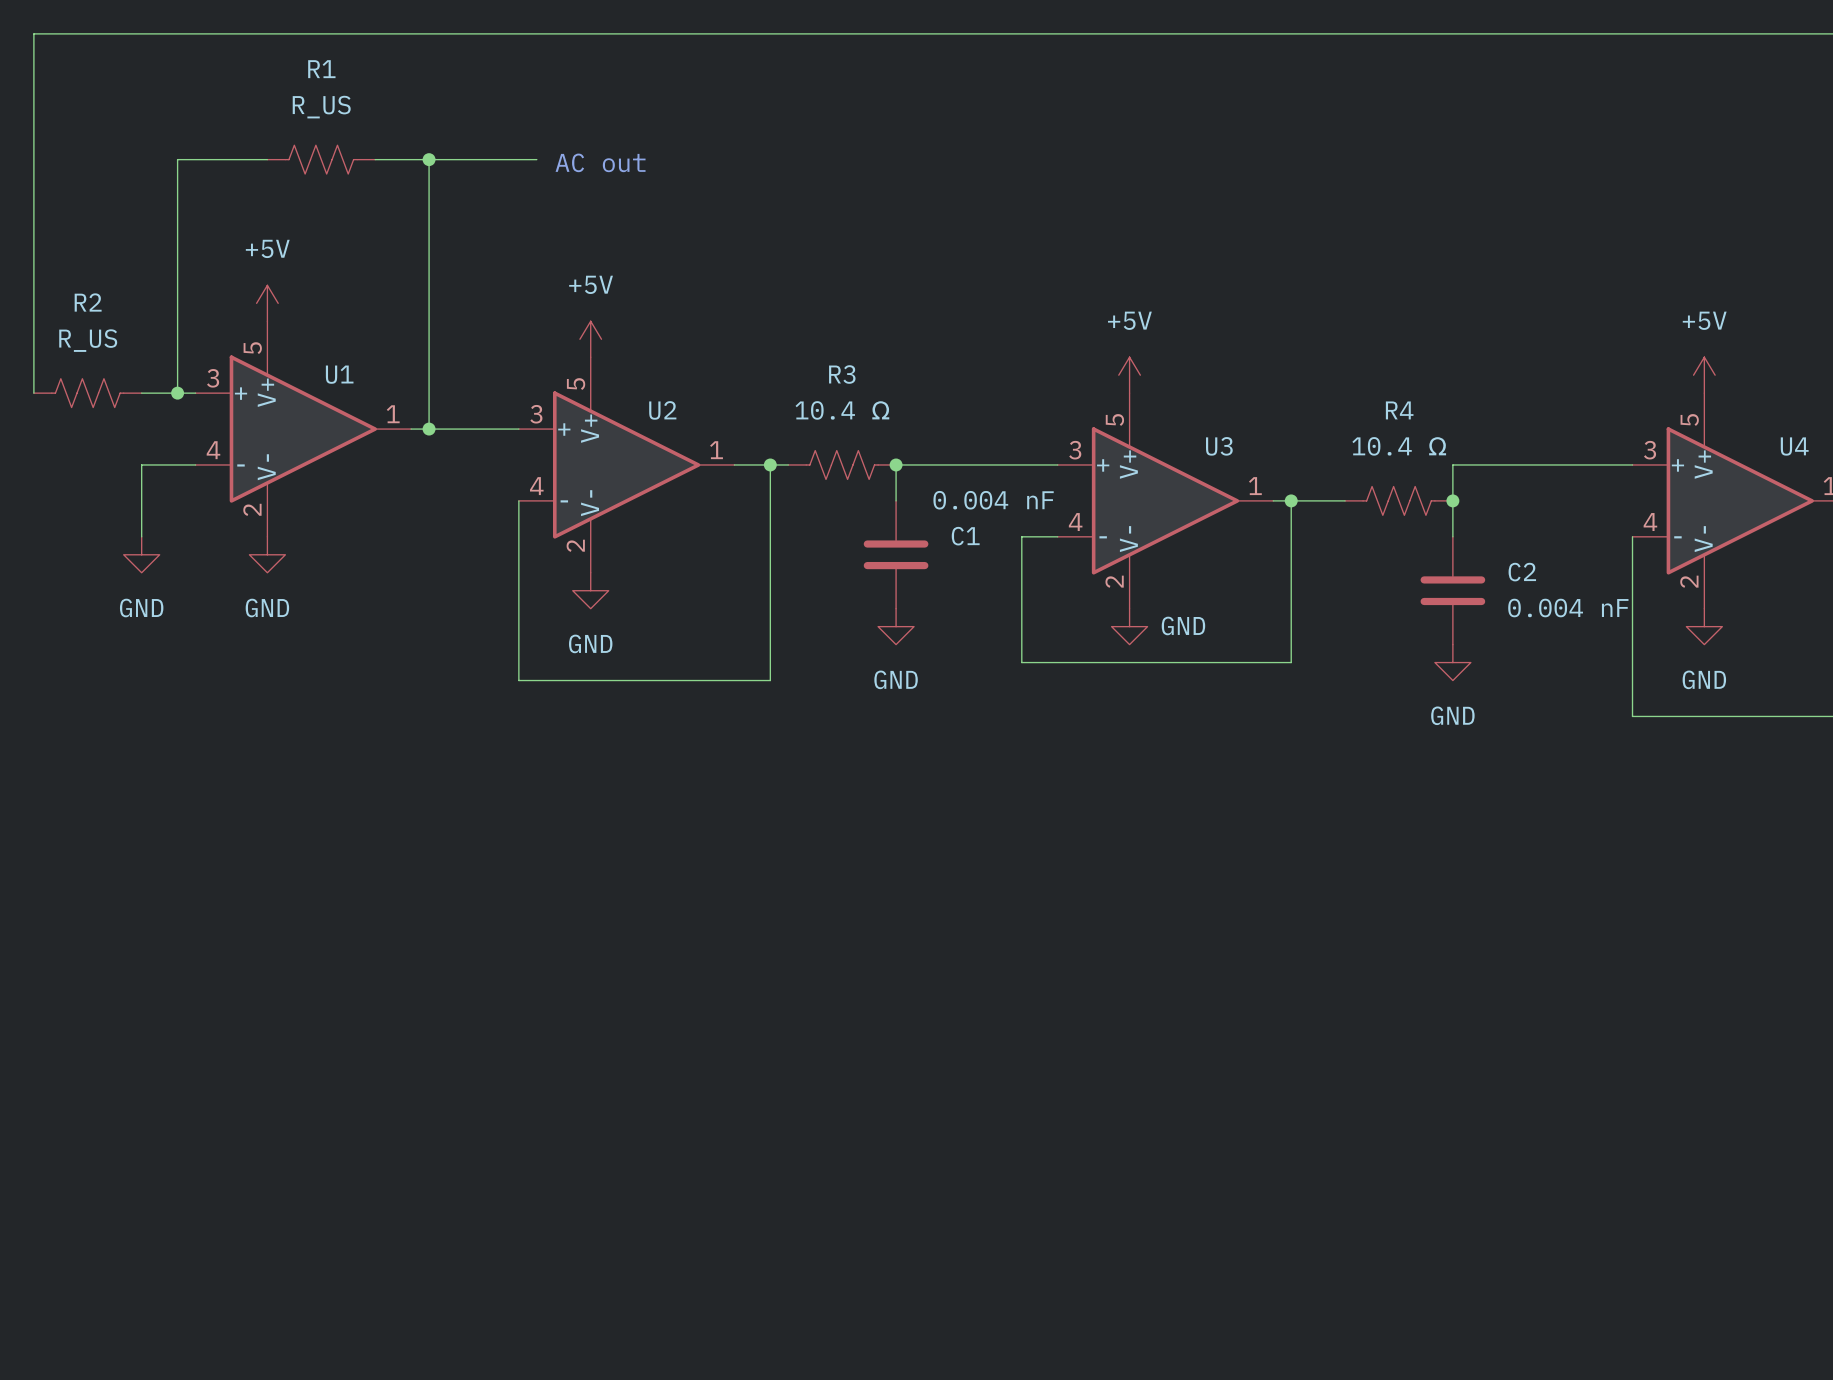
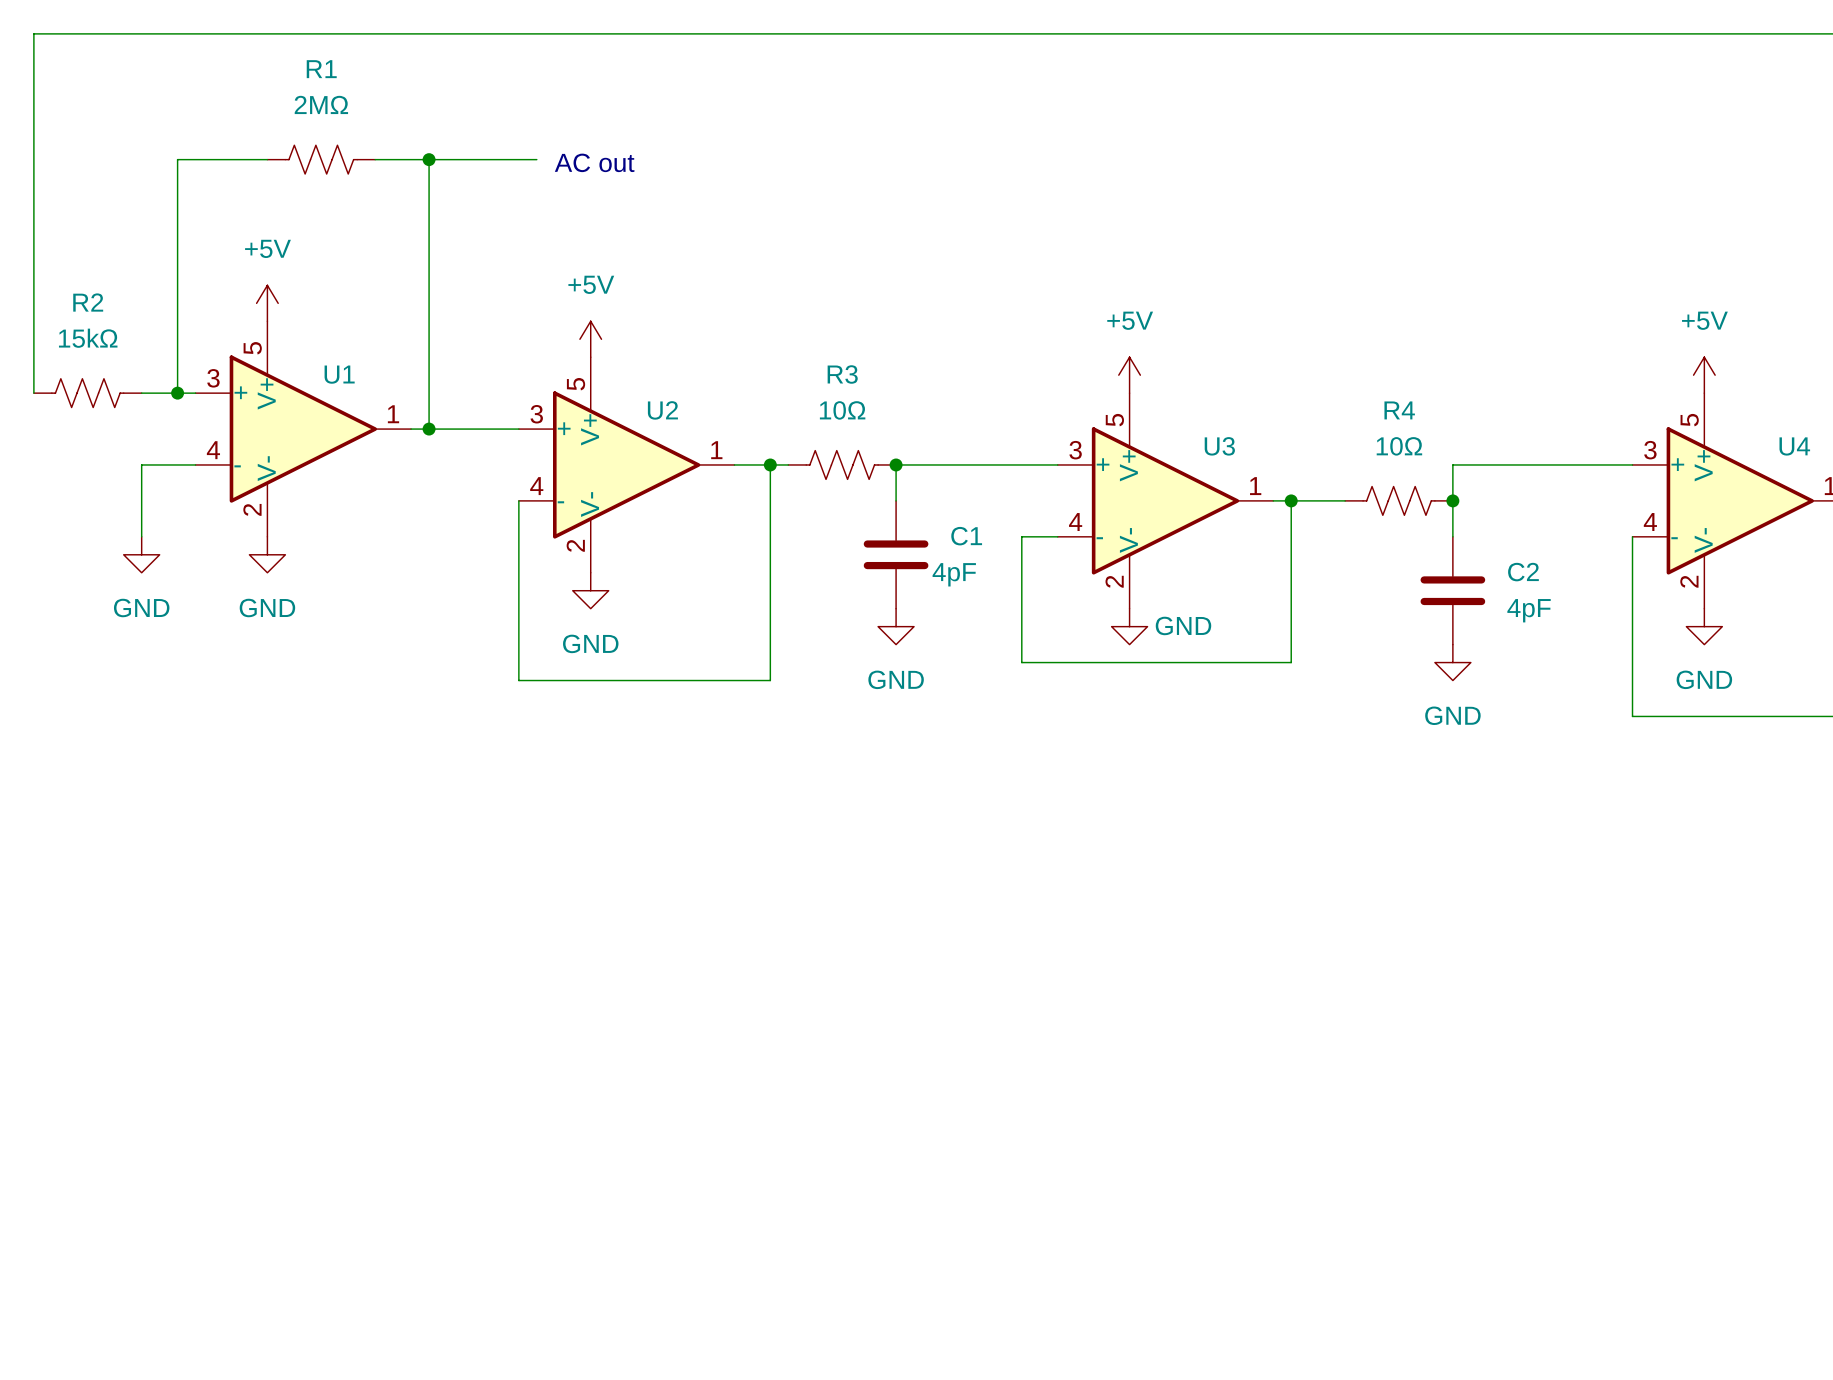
R1 value: R_US (321, 107) -> 2MΩ (321, 104)
R2 value: R_US (88, 340) -> 15kΩ (88, 338)
R3 value: 10.4 Ω (842, 410) -> 10Ω (842, 410)
R4 value: 10.4 Ω (1399, 446) -> 10Ω (1399, 446)
C1 value: 0.004 nF (993, 500) -> 4pF (954, 574)
C2 value: 0.004 nF (1568, 608) -> 4pF (1529, 610)

